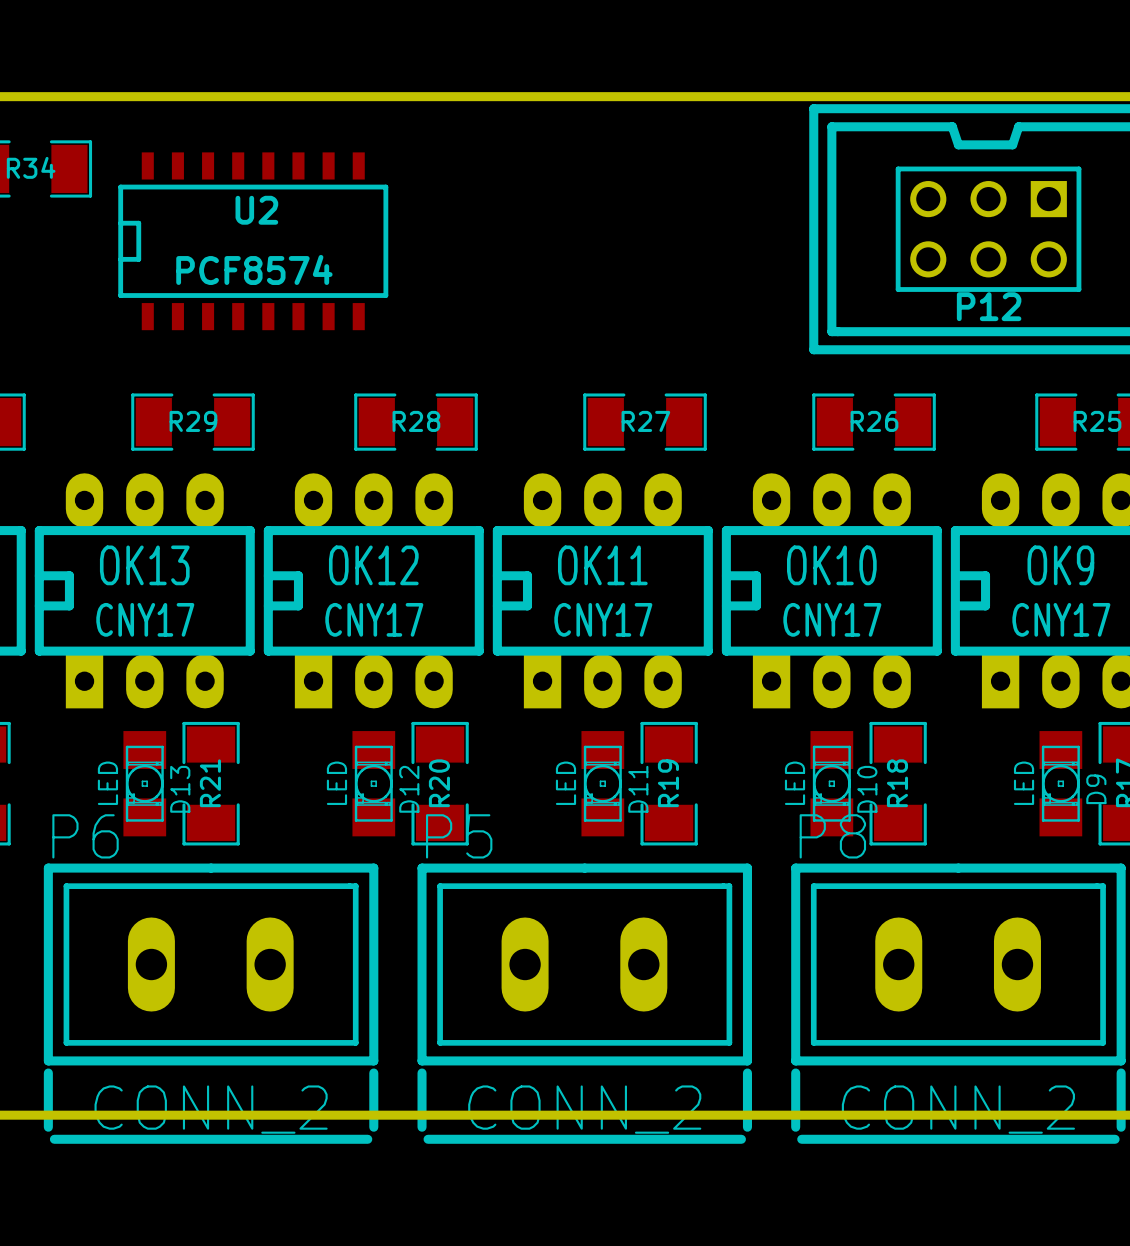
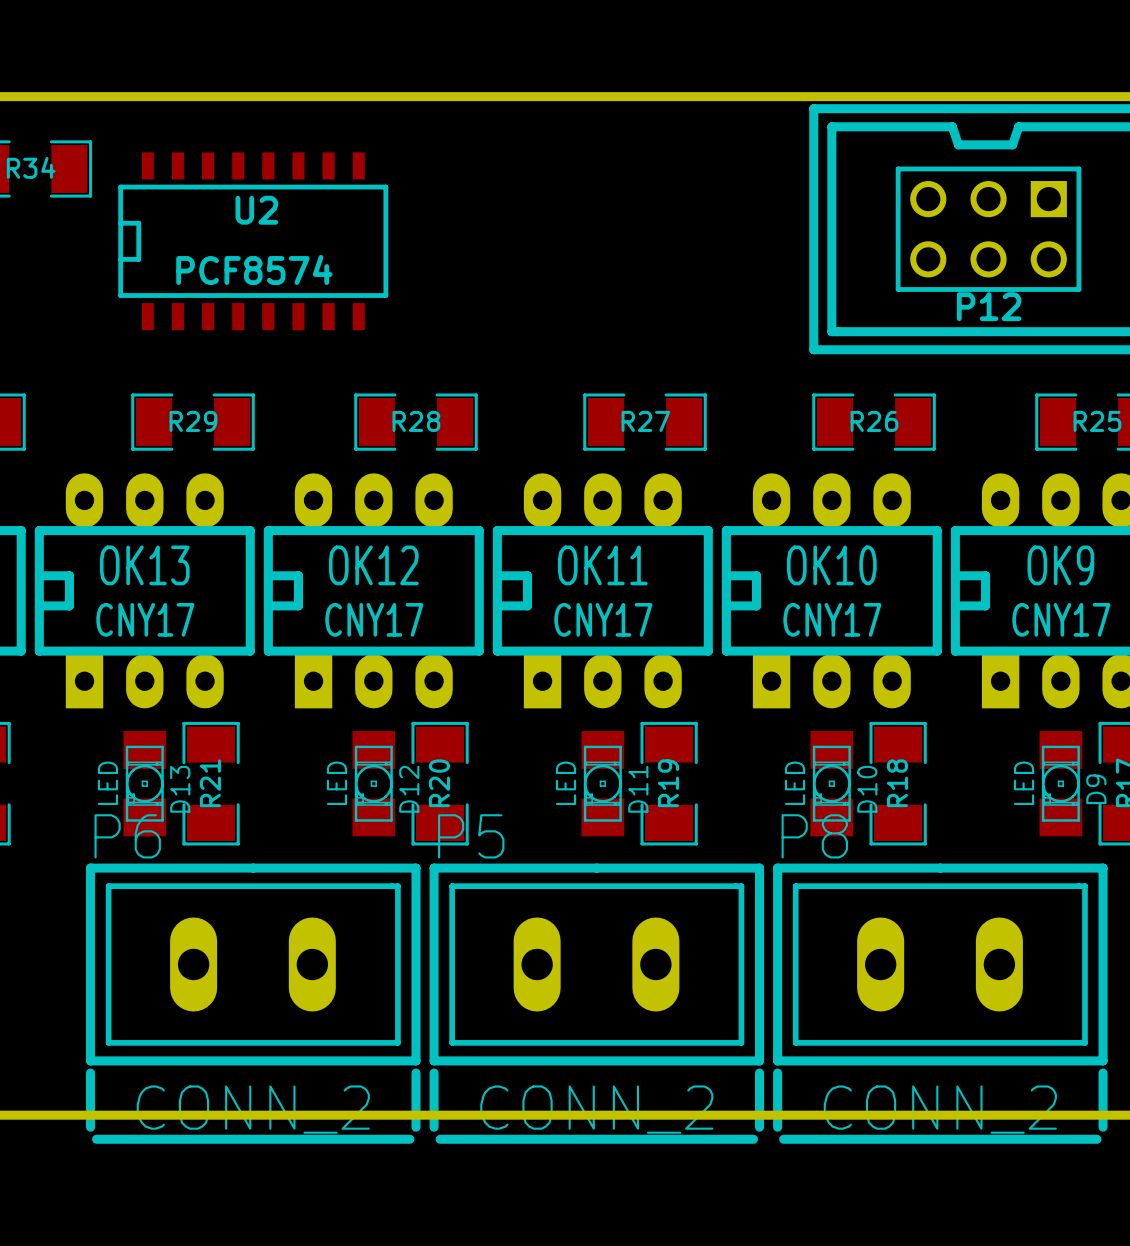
P6 position: (211, 1003) -> (253, 1003)
P5 position: (584, 1003) -> (596, 1003)
P8 position: (958, 1003) -> (940, 1003)

